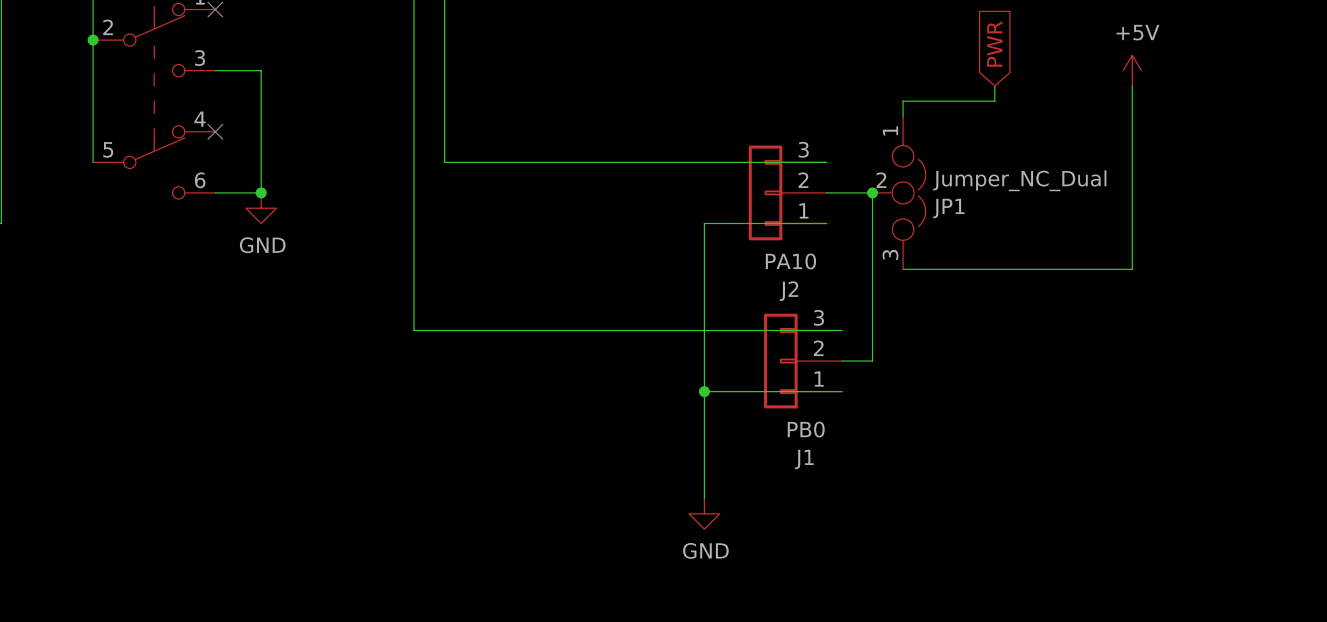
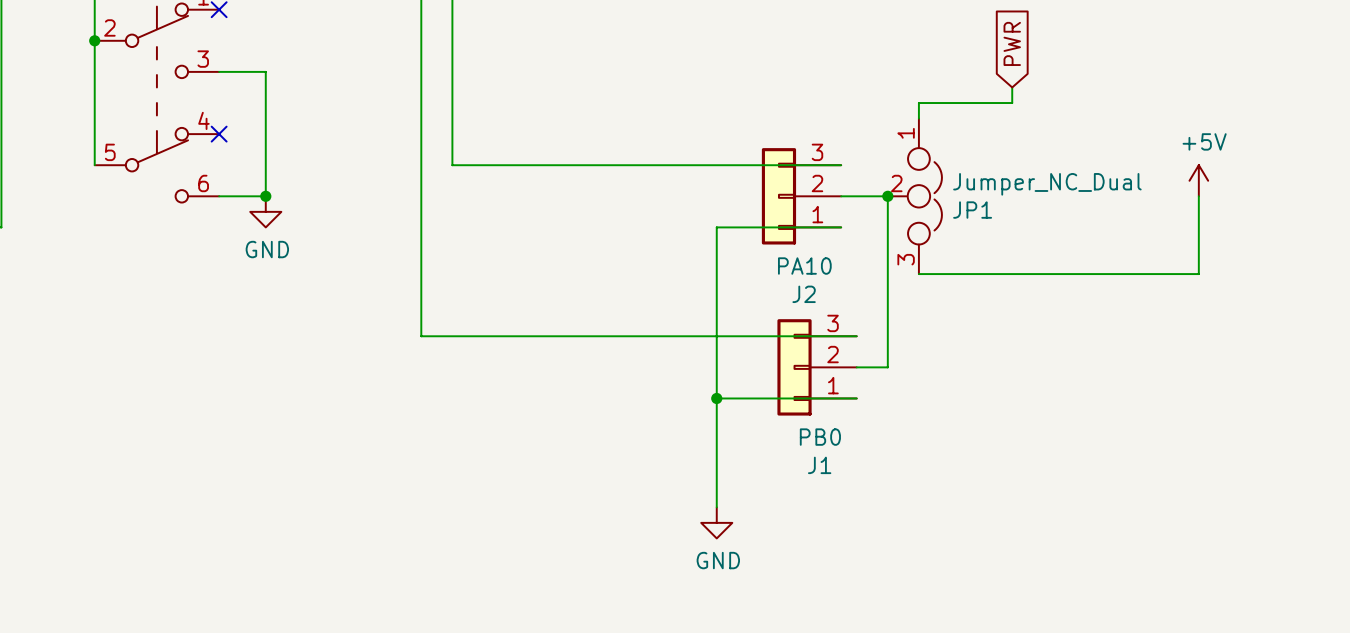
power symbol position: +5V (1132, 70) -> +5V (1198, 180)
wire: (1132, 85) (1132, 269) -> (1198, 196) (1198, 274) (1152, 274)

